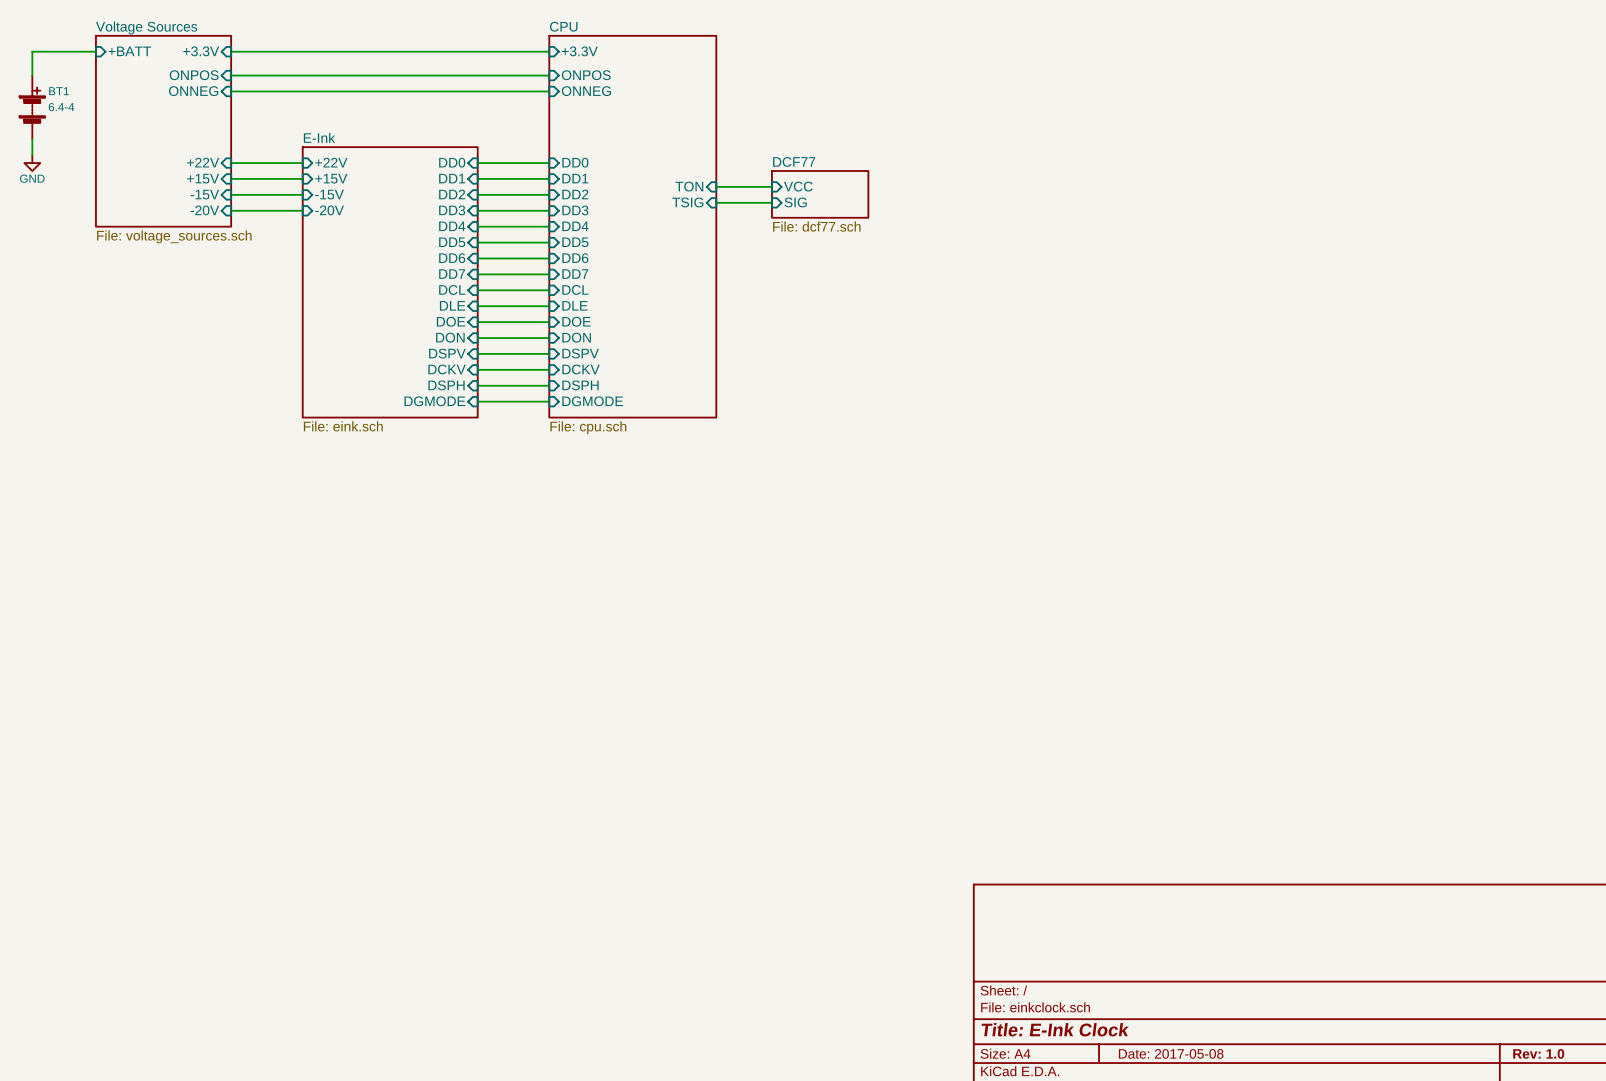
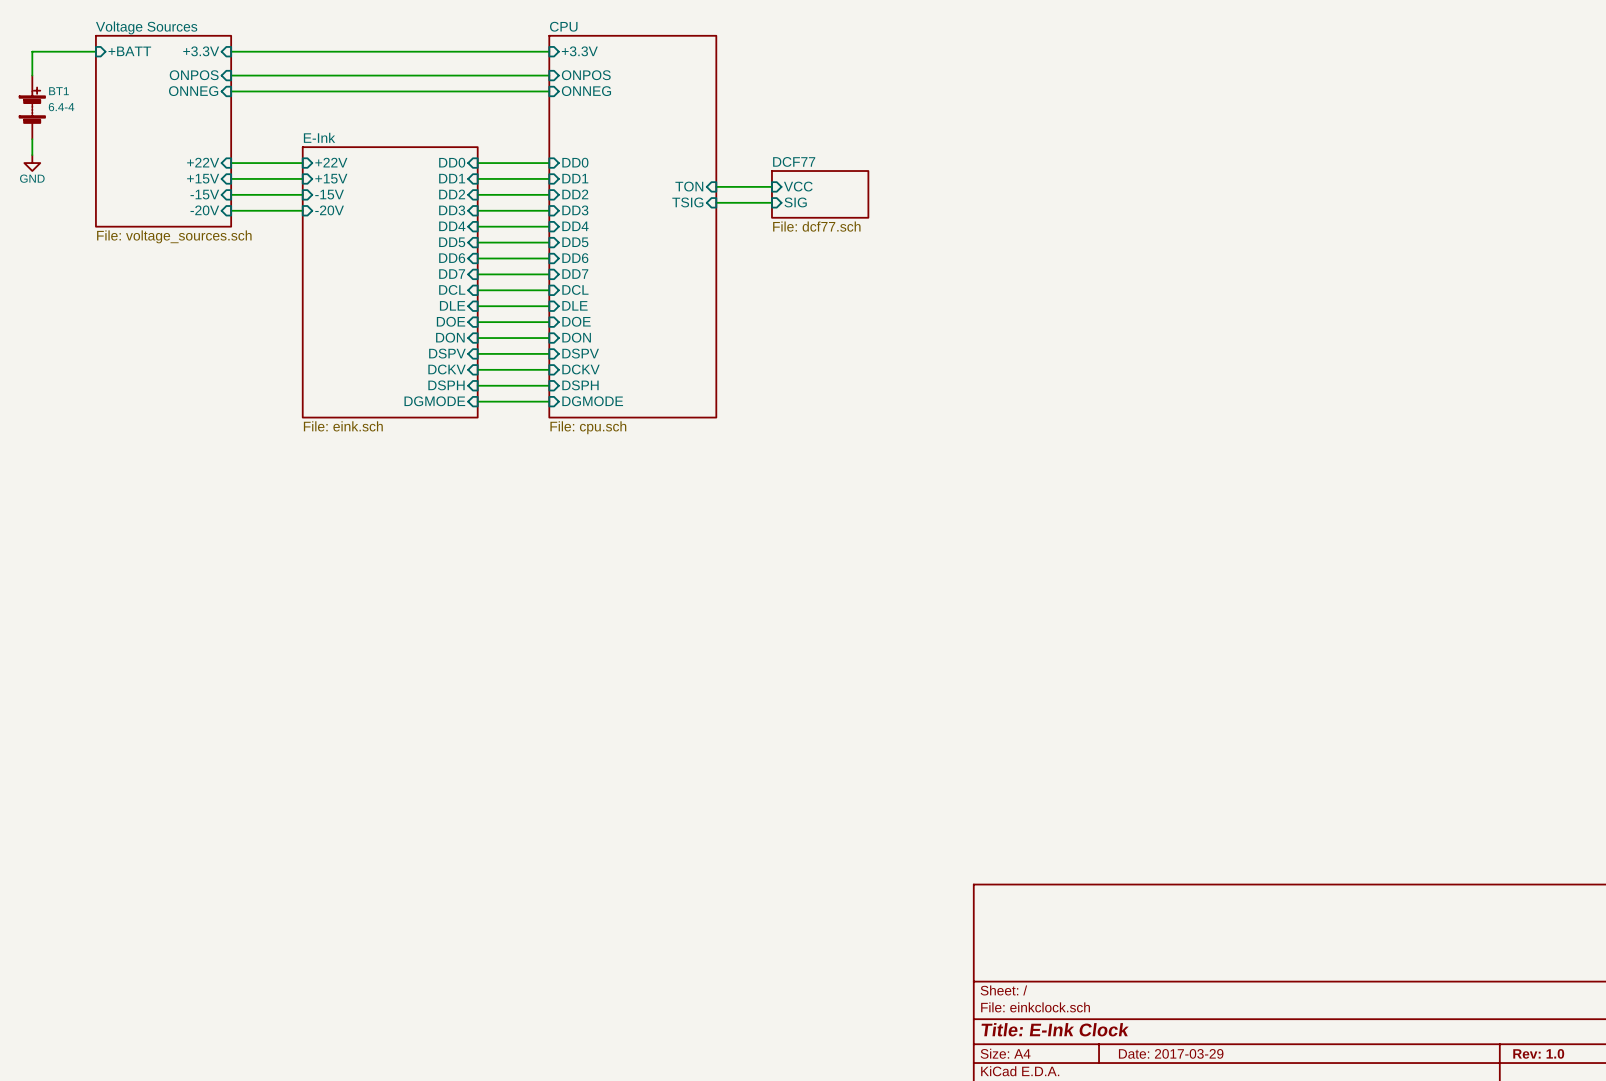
title block: Date: 2017-05-08 (1171, 1053) -> Date: 2017-03-29 (1171, 1053)

